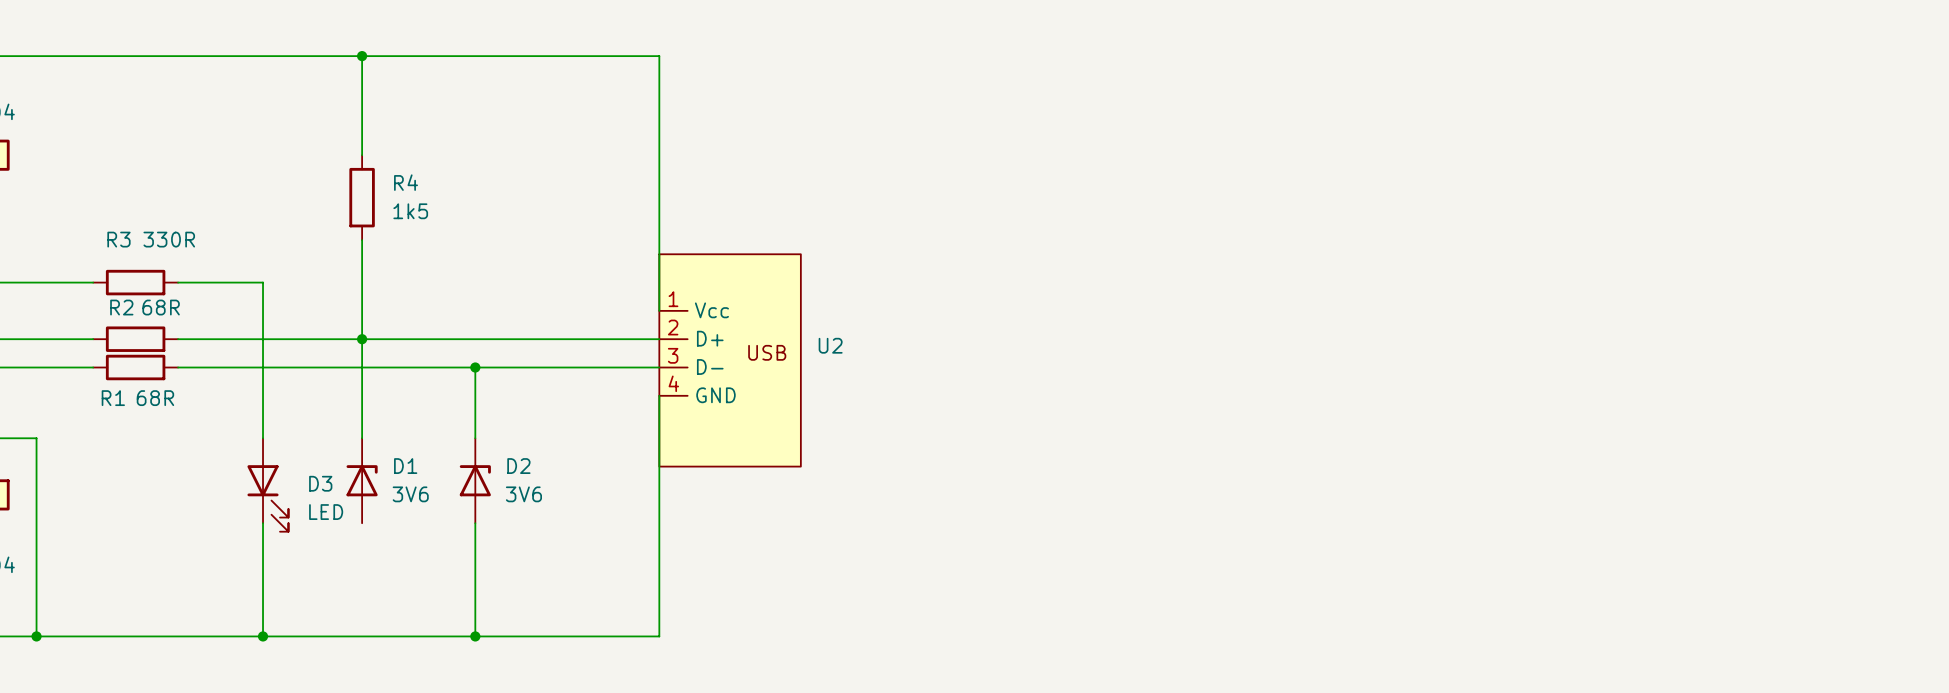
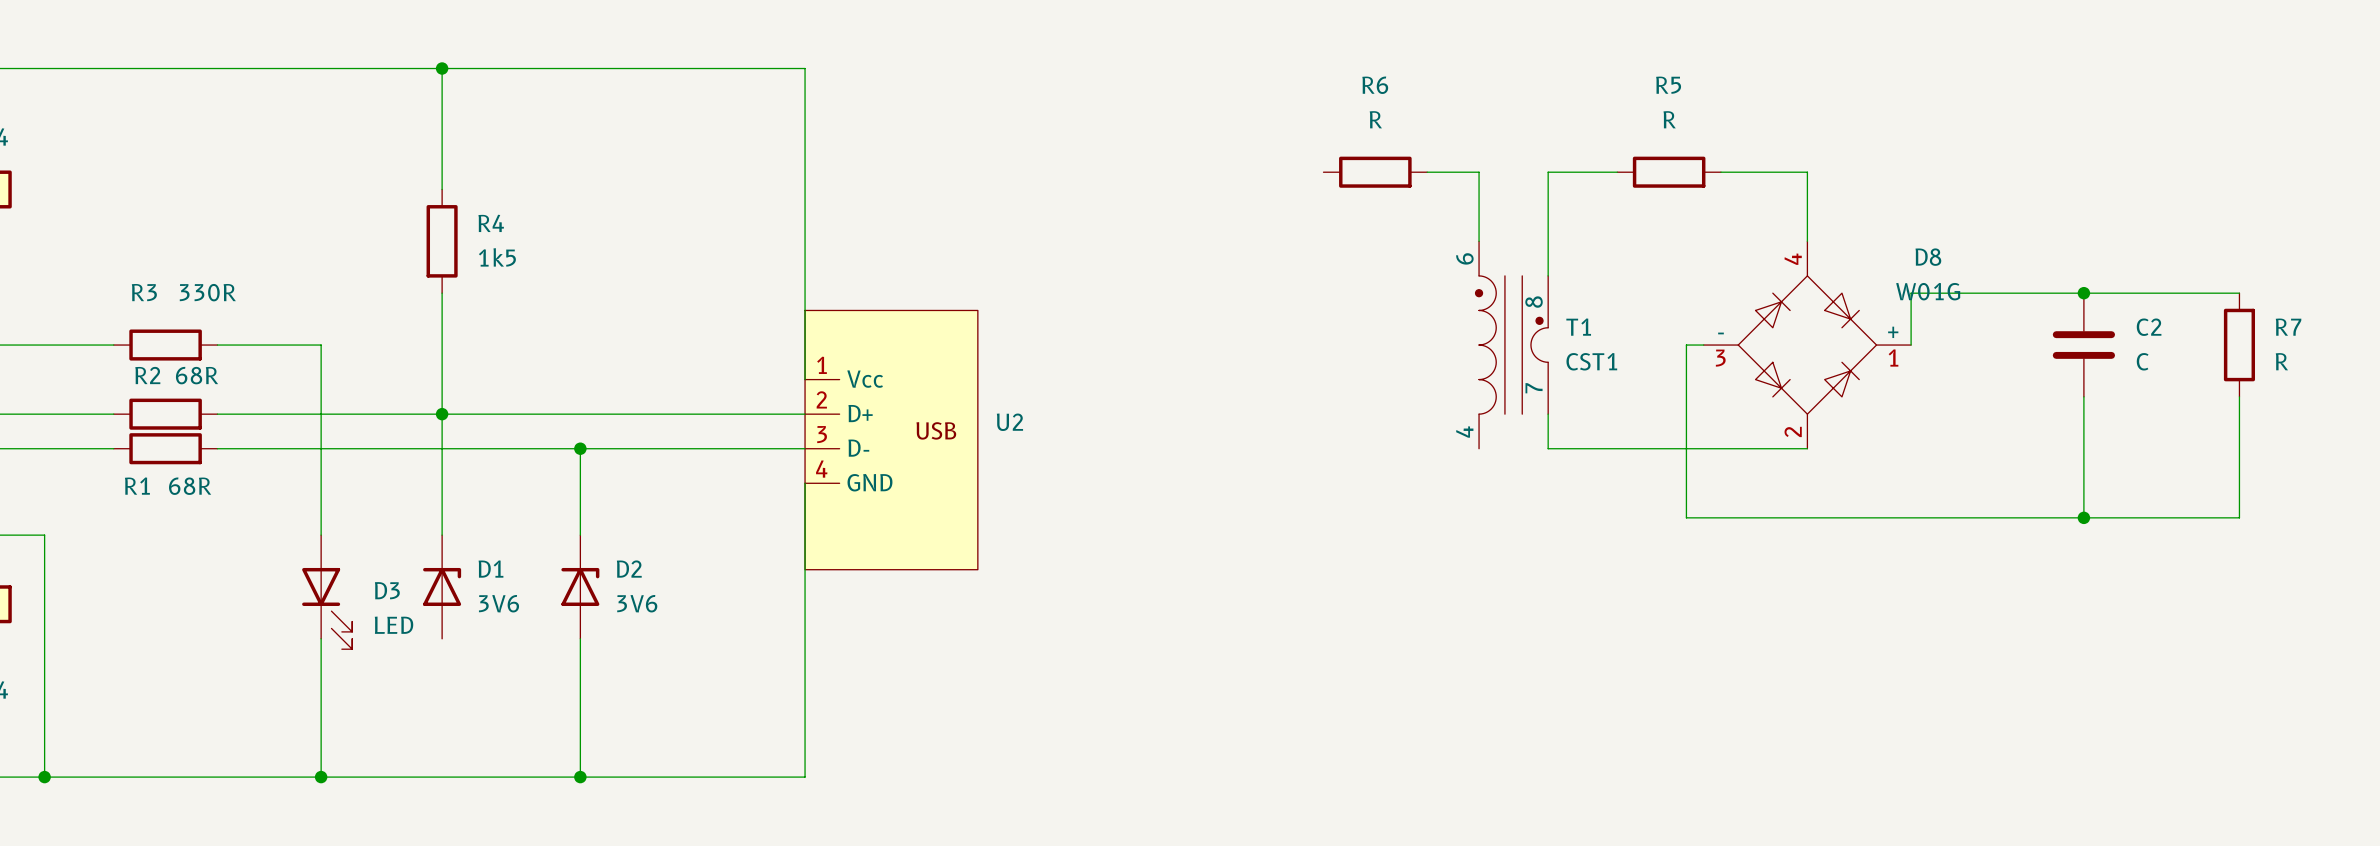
R6: none -> R (1375, 172)
wire: none -> (1427, 172) (1479, 172) (1479, 241)
wire: none -> (1617, 172) (1548, 172) (1548, 275)
R5: none -> R (1669, 172)
wire: none -> (1720, 172) (1807, 172) (1807, 241)
junction: none -> (2083, 293)
wire: none -> (2239, 293) (1911, 293) (1911, 345)
T1: none -> CST1 (1511, 345)
wire: none -> (1703, 345) (1686, 345) (1686, 517) (2239, 517) (2239, 396)
D8: none -> W01G (1807, 345)
C2: none -> C (2083, 345)
R7: none -> R (2239, 345)
wire: none -> (2083, 396) (2083, 517)
wire: none -> (1548, 414) (1548, 448) (1807, 448)
junction: none -> (2083, 517)

